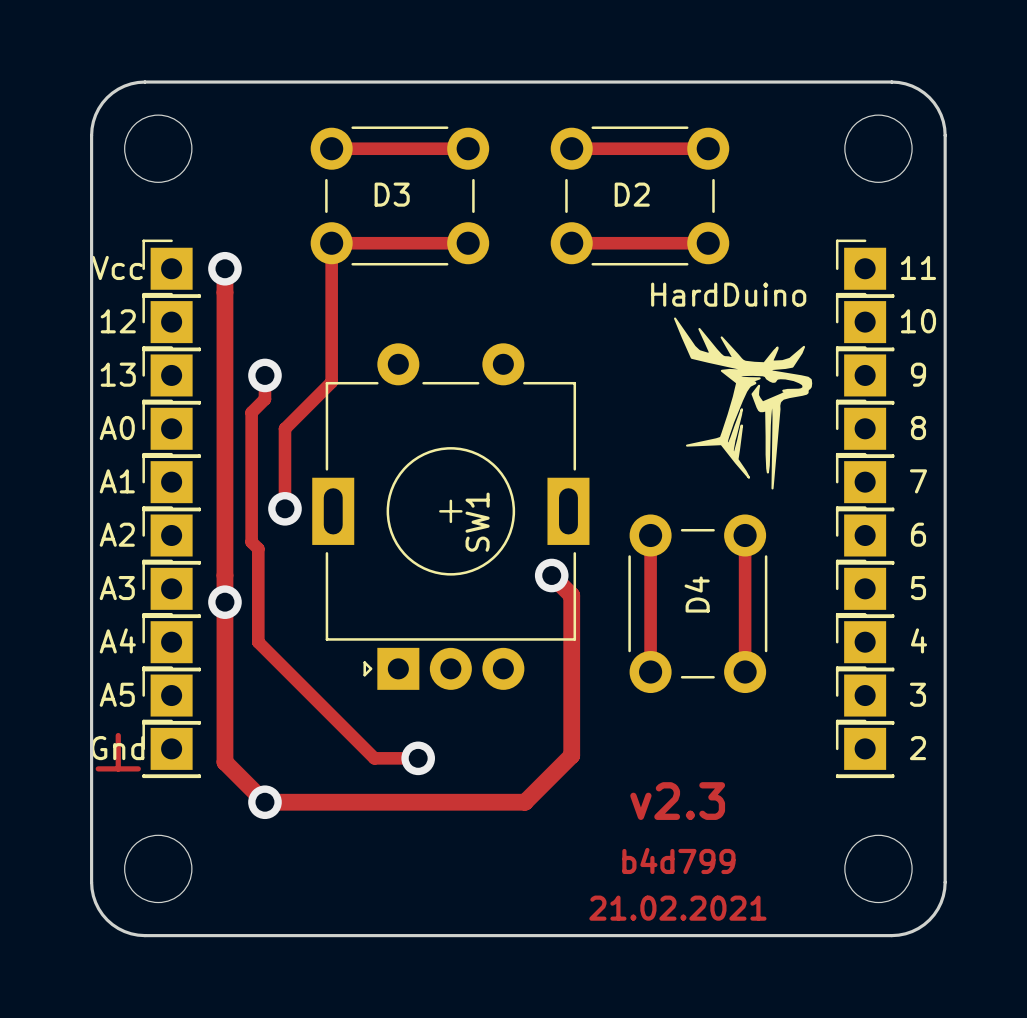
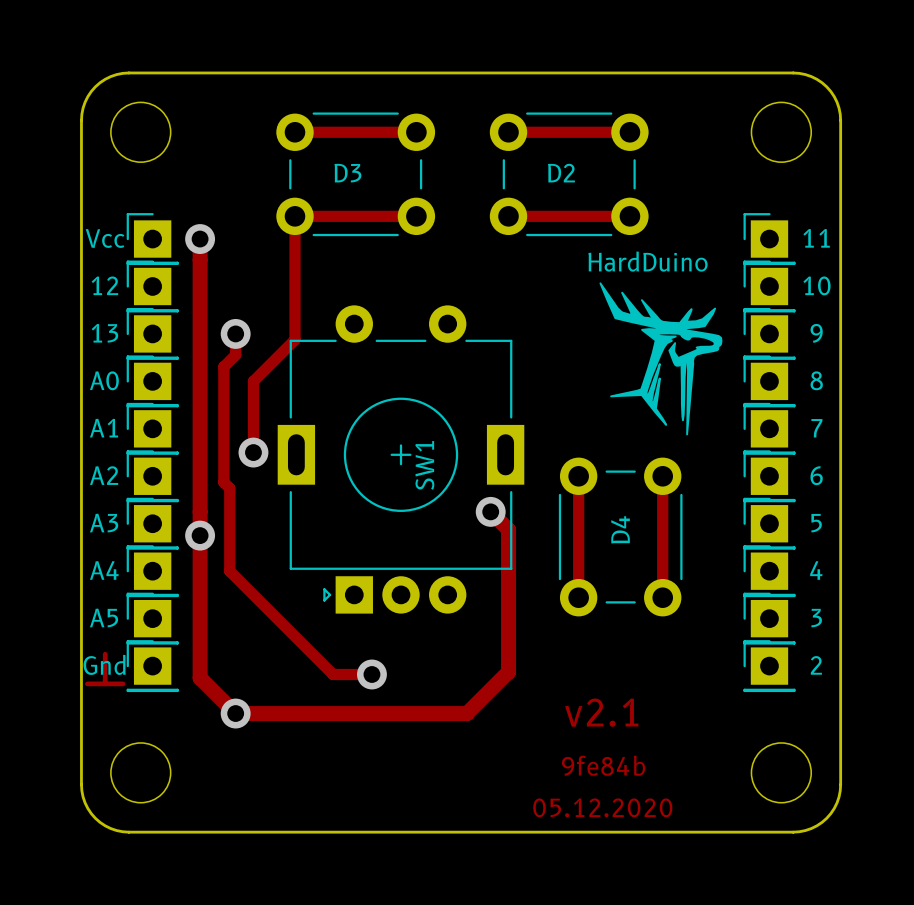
text: v2.3 (677, 801) -> v2.1 (601, 712)
text: b4d799 (678, 860) -> 9fe84b (603, 765)
text: 21.02.2021 (677, 908) -> 05.12.2020 (602, 807)

